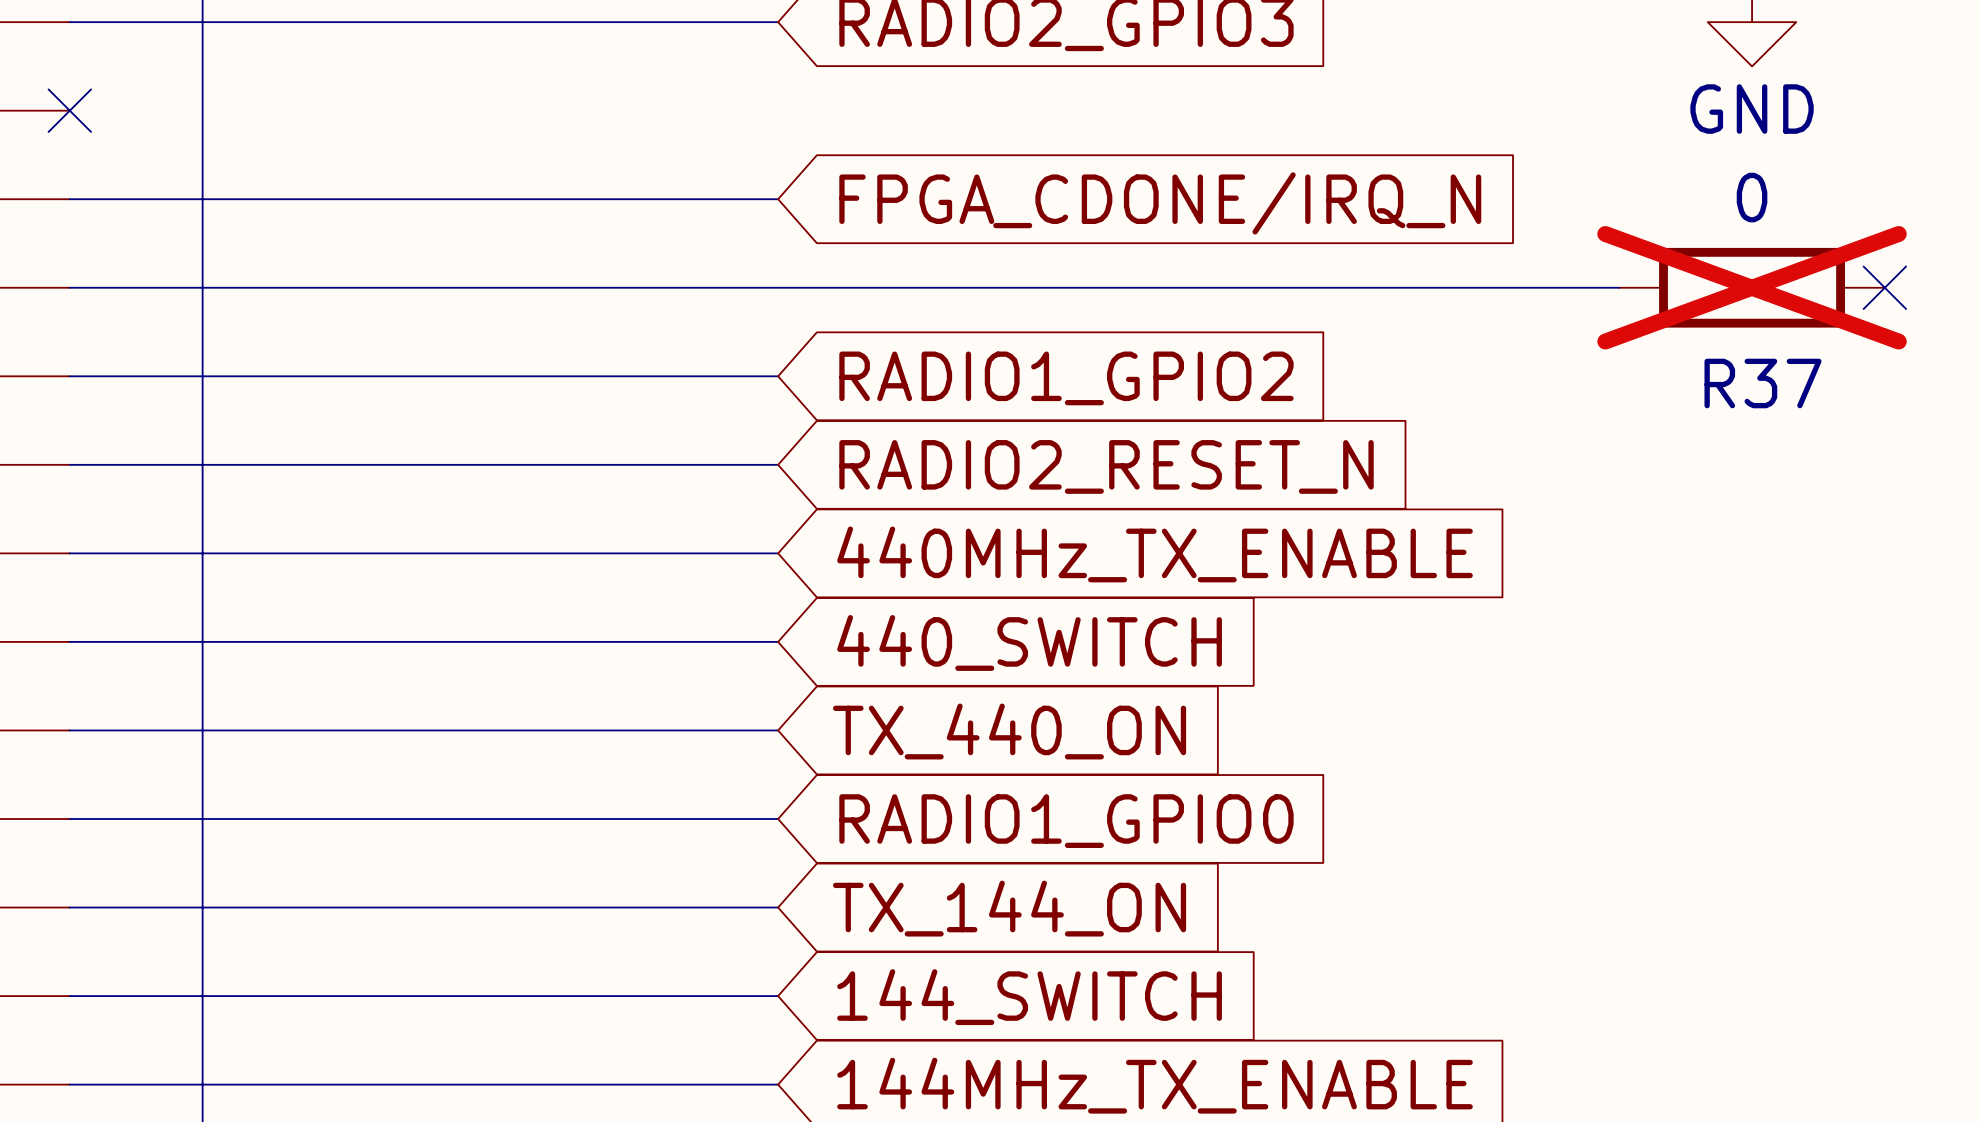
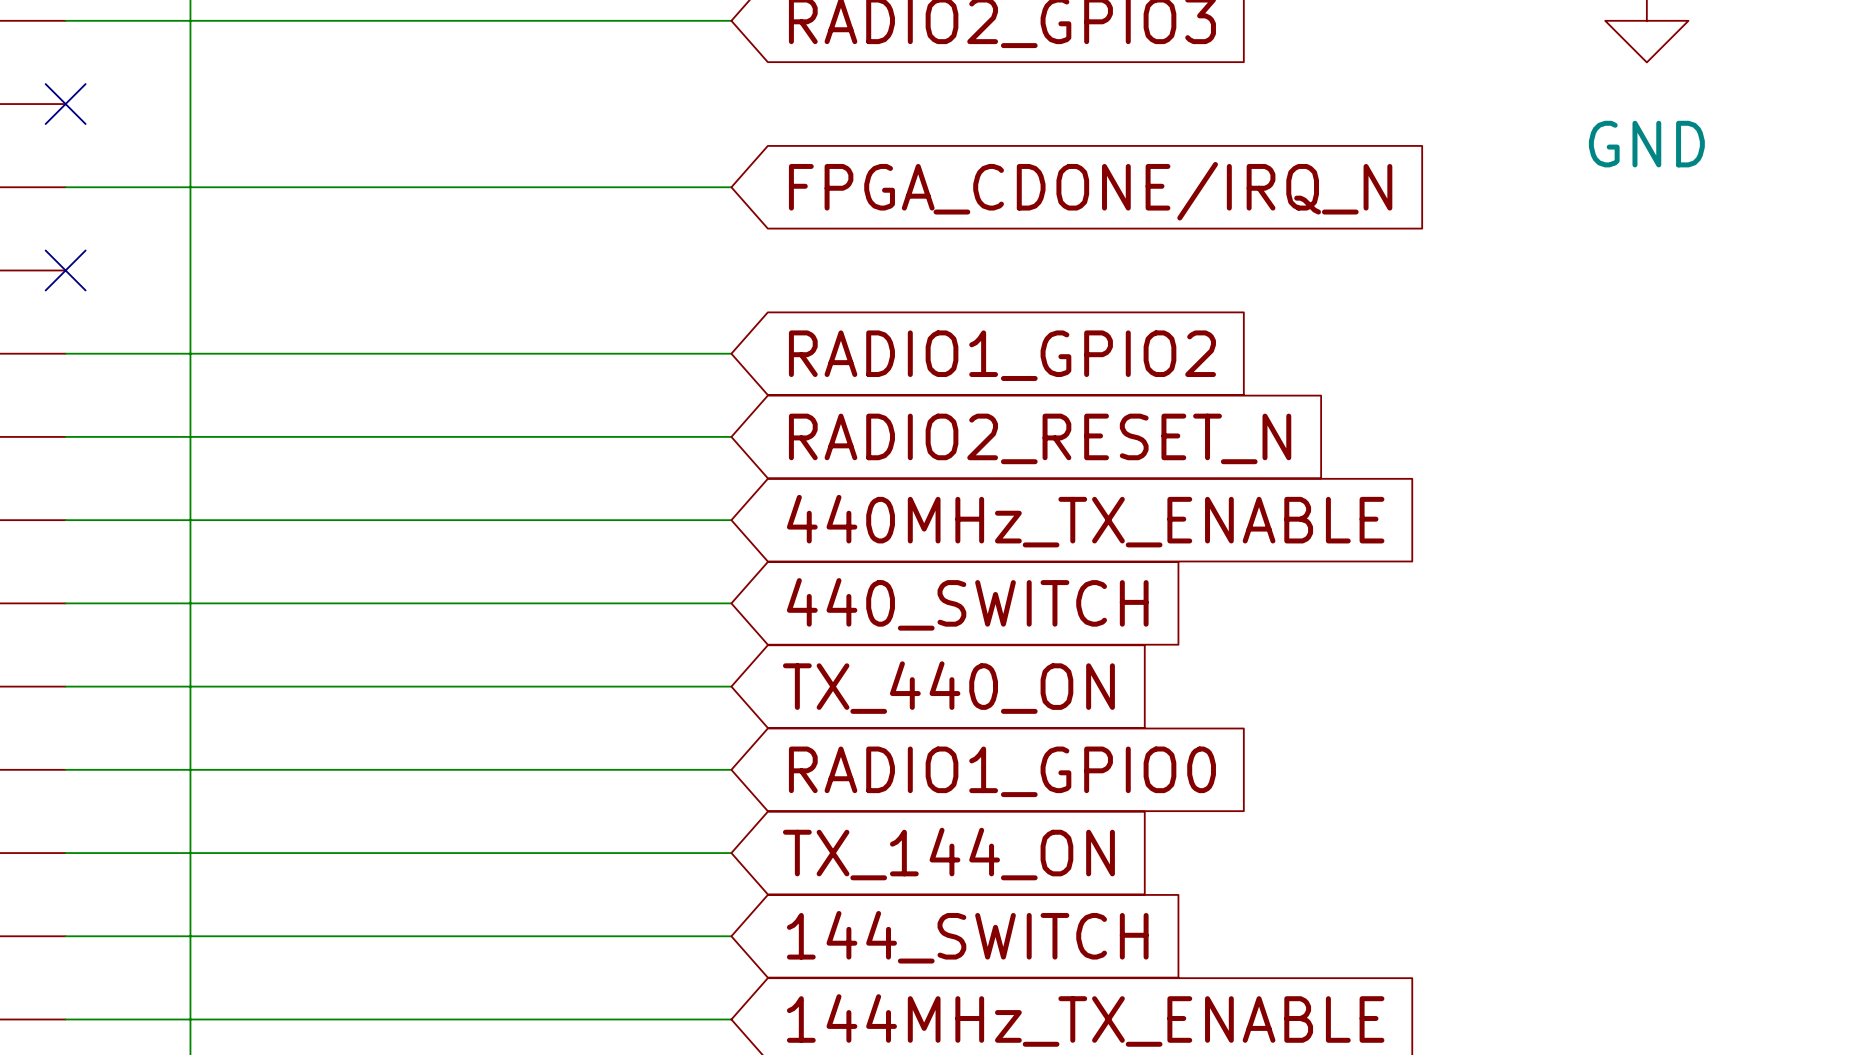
power symbol text position: GND (1752, 109) -> GND (1646, 144)
wire: (69, 287) (1619, 287) -> none
no-connect mark: none -> (65, 270)
R37: 0 (1752, 287) -> none
no-connect mark: (1884, 287) -> none

